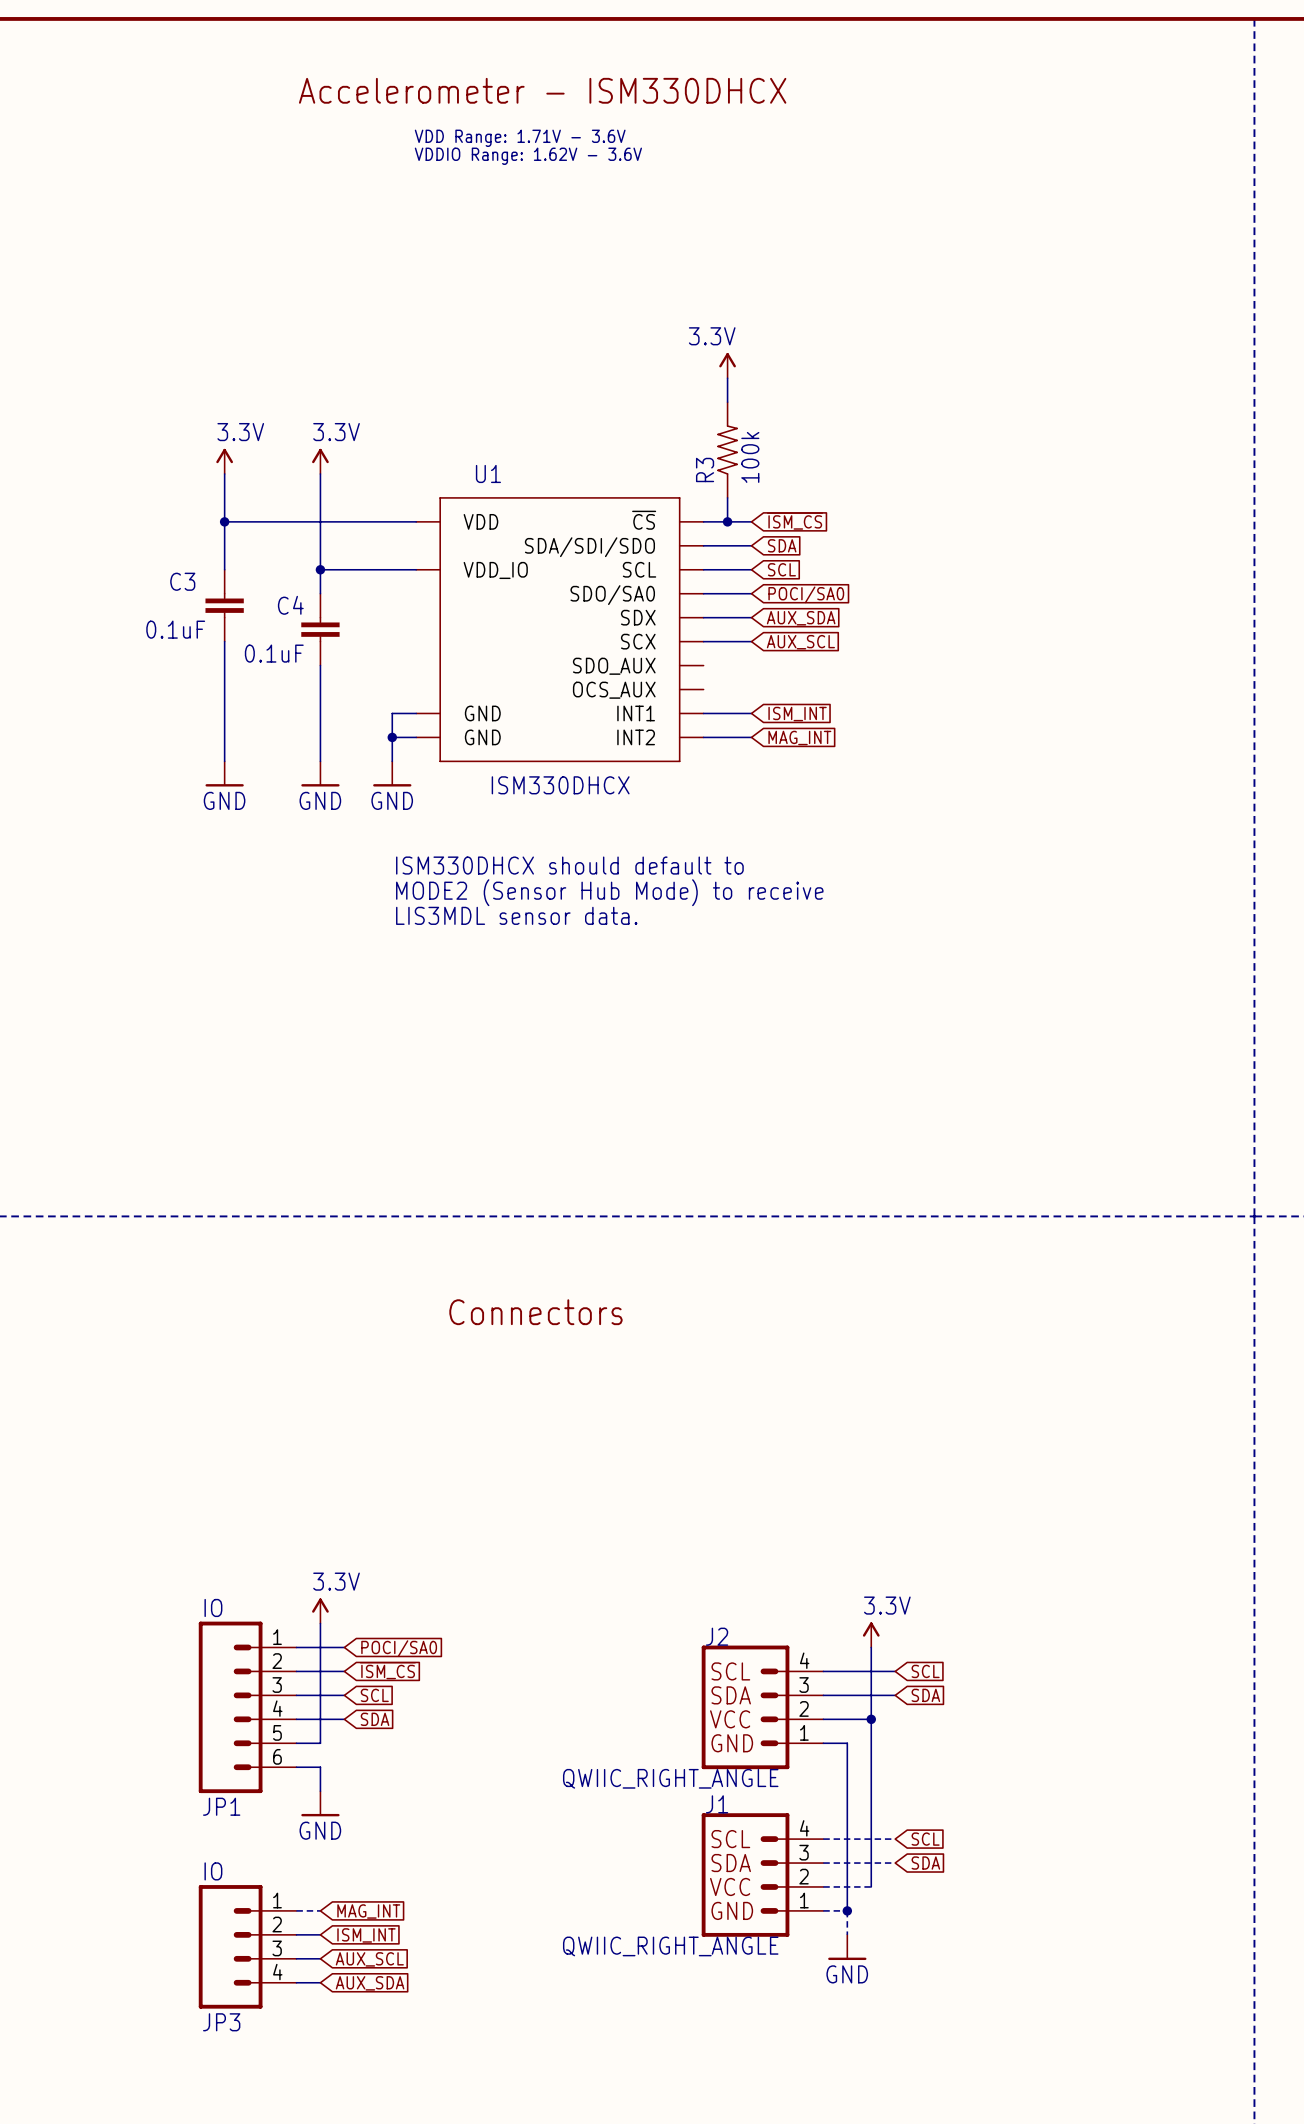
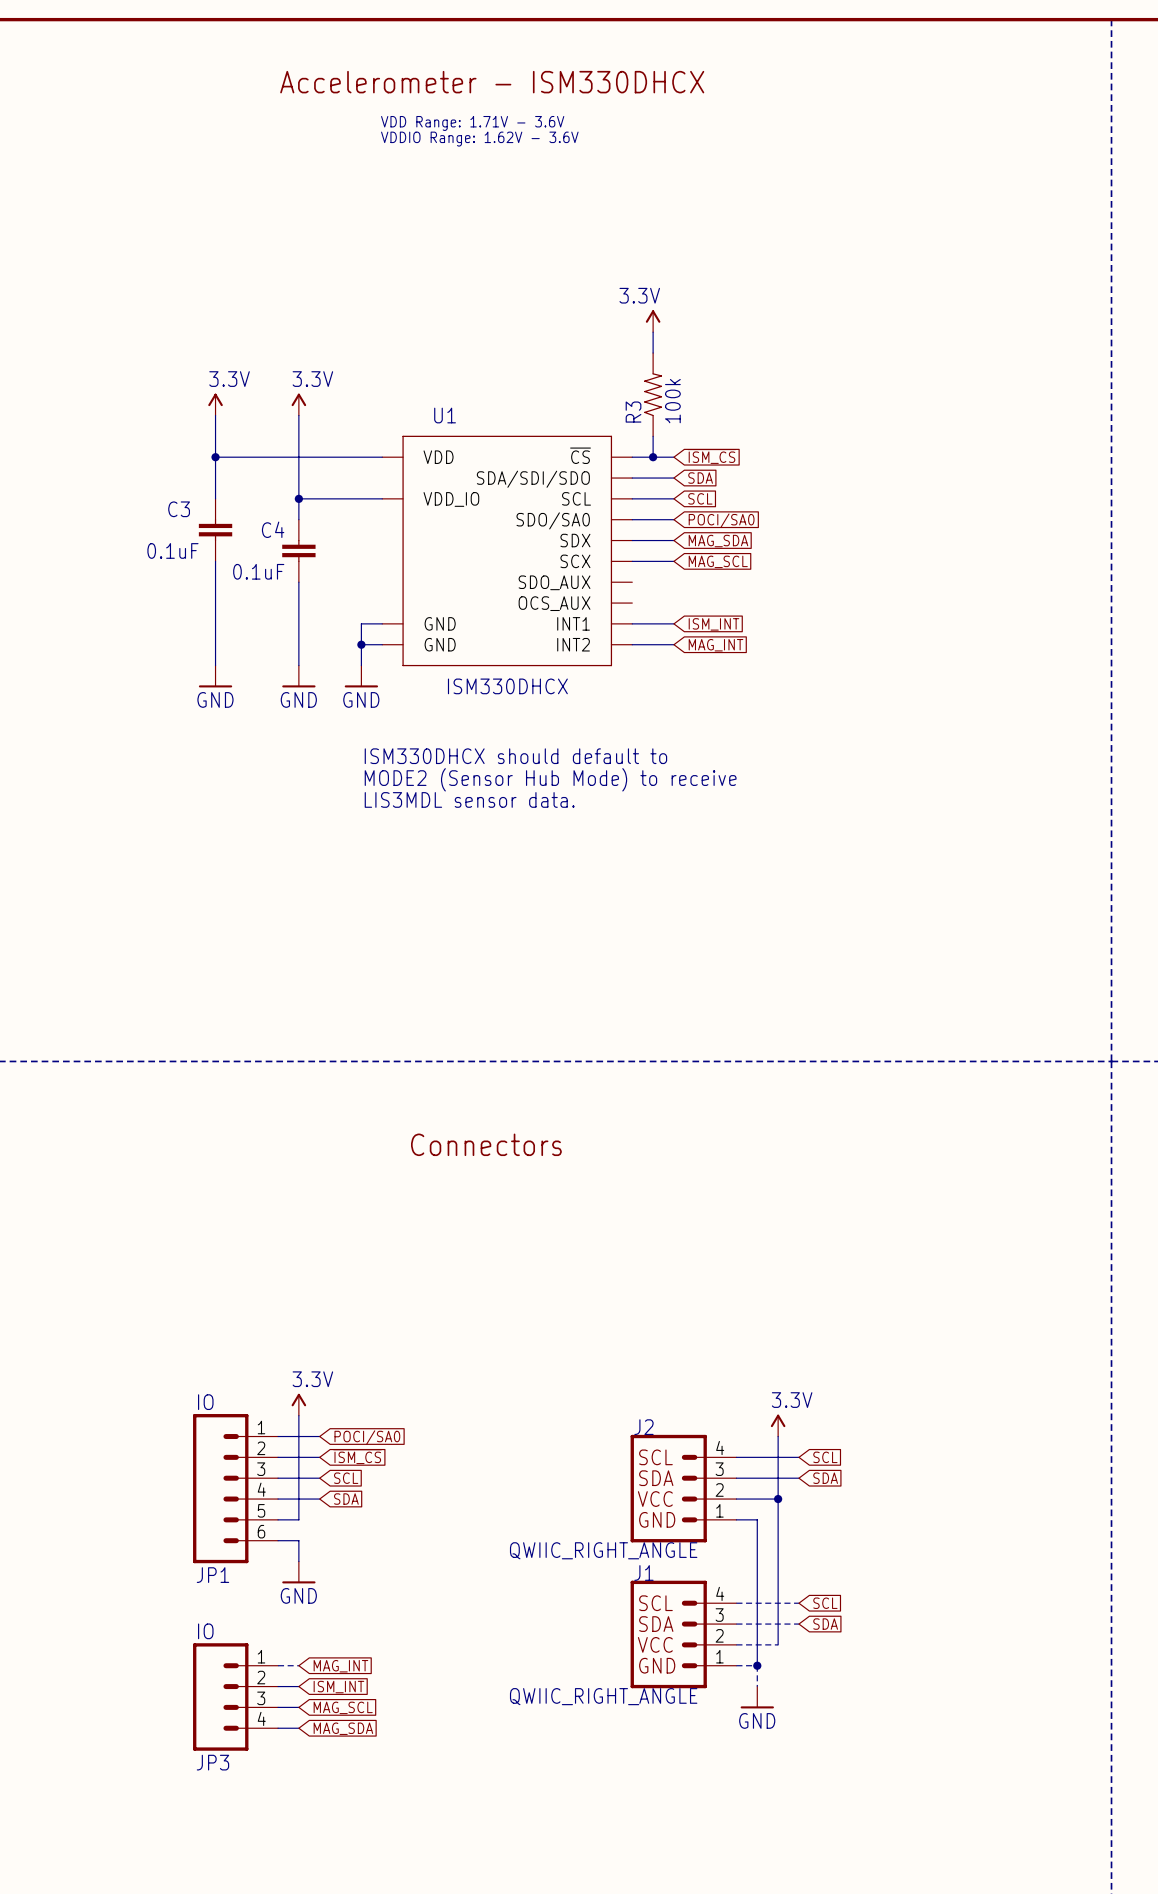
global label: AUX_SDA (801, 618) -> MAG_SDA (718, 541)
global label: AUX_SCL (800, 642) -> MAG_SCL (718, 561)
global label: AUX_SCL (369, 1959) -> MAG_SCL (343, 1707)
global label: AUX_SDA (370, 1983) -> MAG_SDA (343, 1728)

